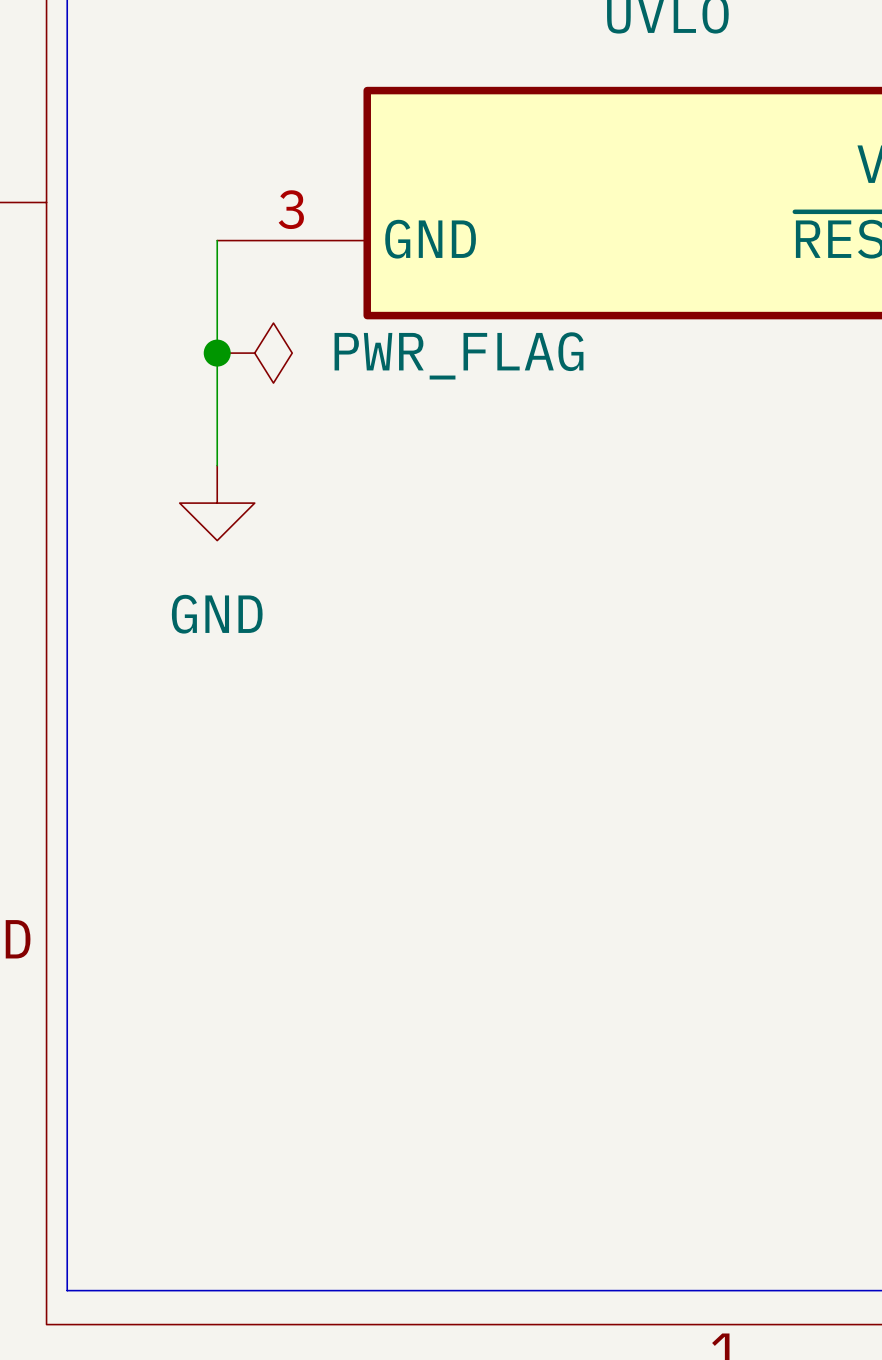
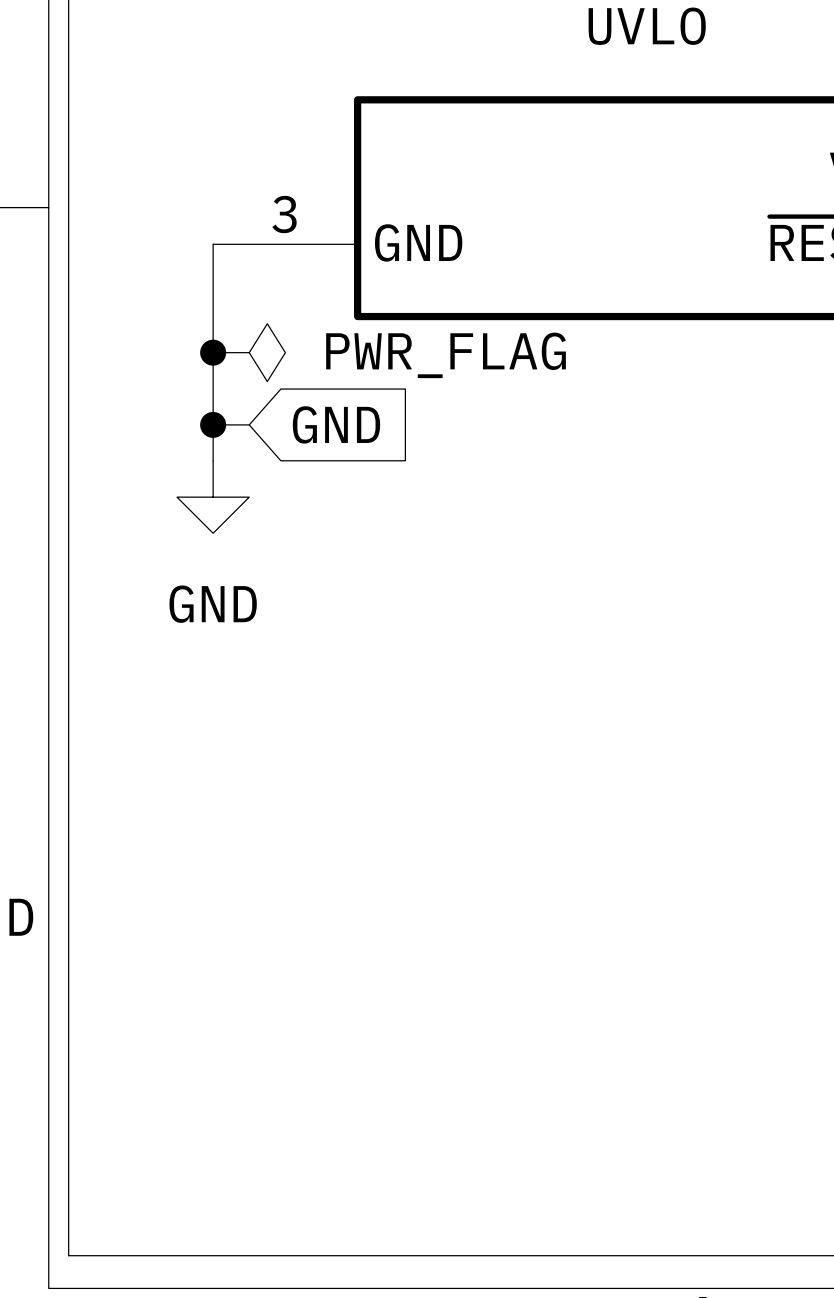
wire: none -> (213, 424) (249, 424)
junction: none -> (213, 424)
global label: none -> GND (336, 424)

